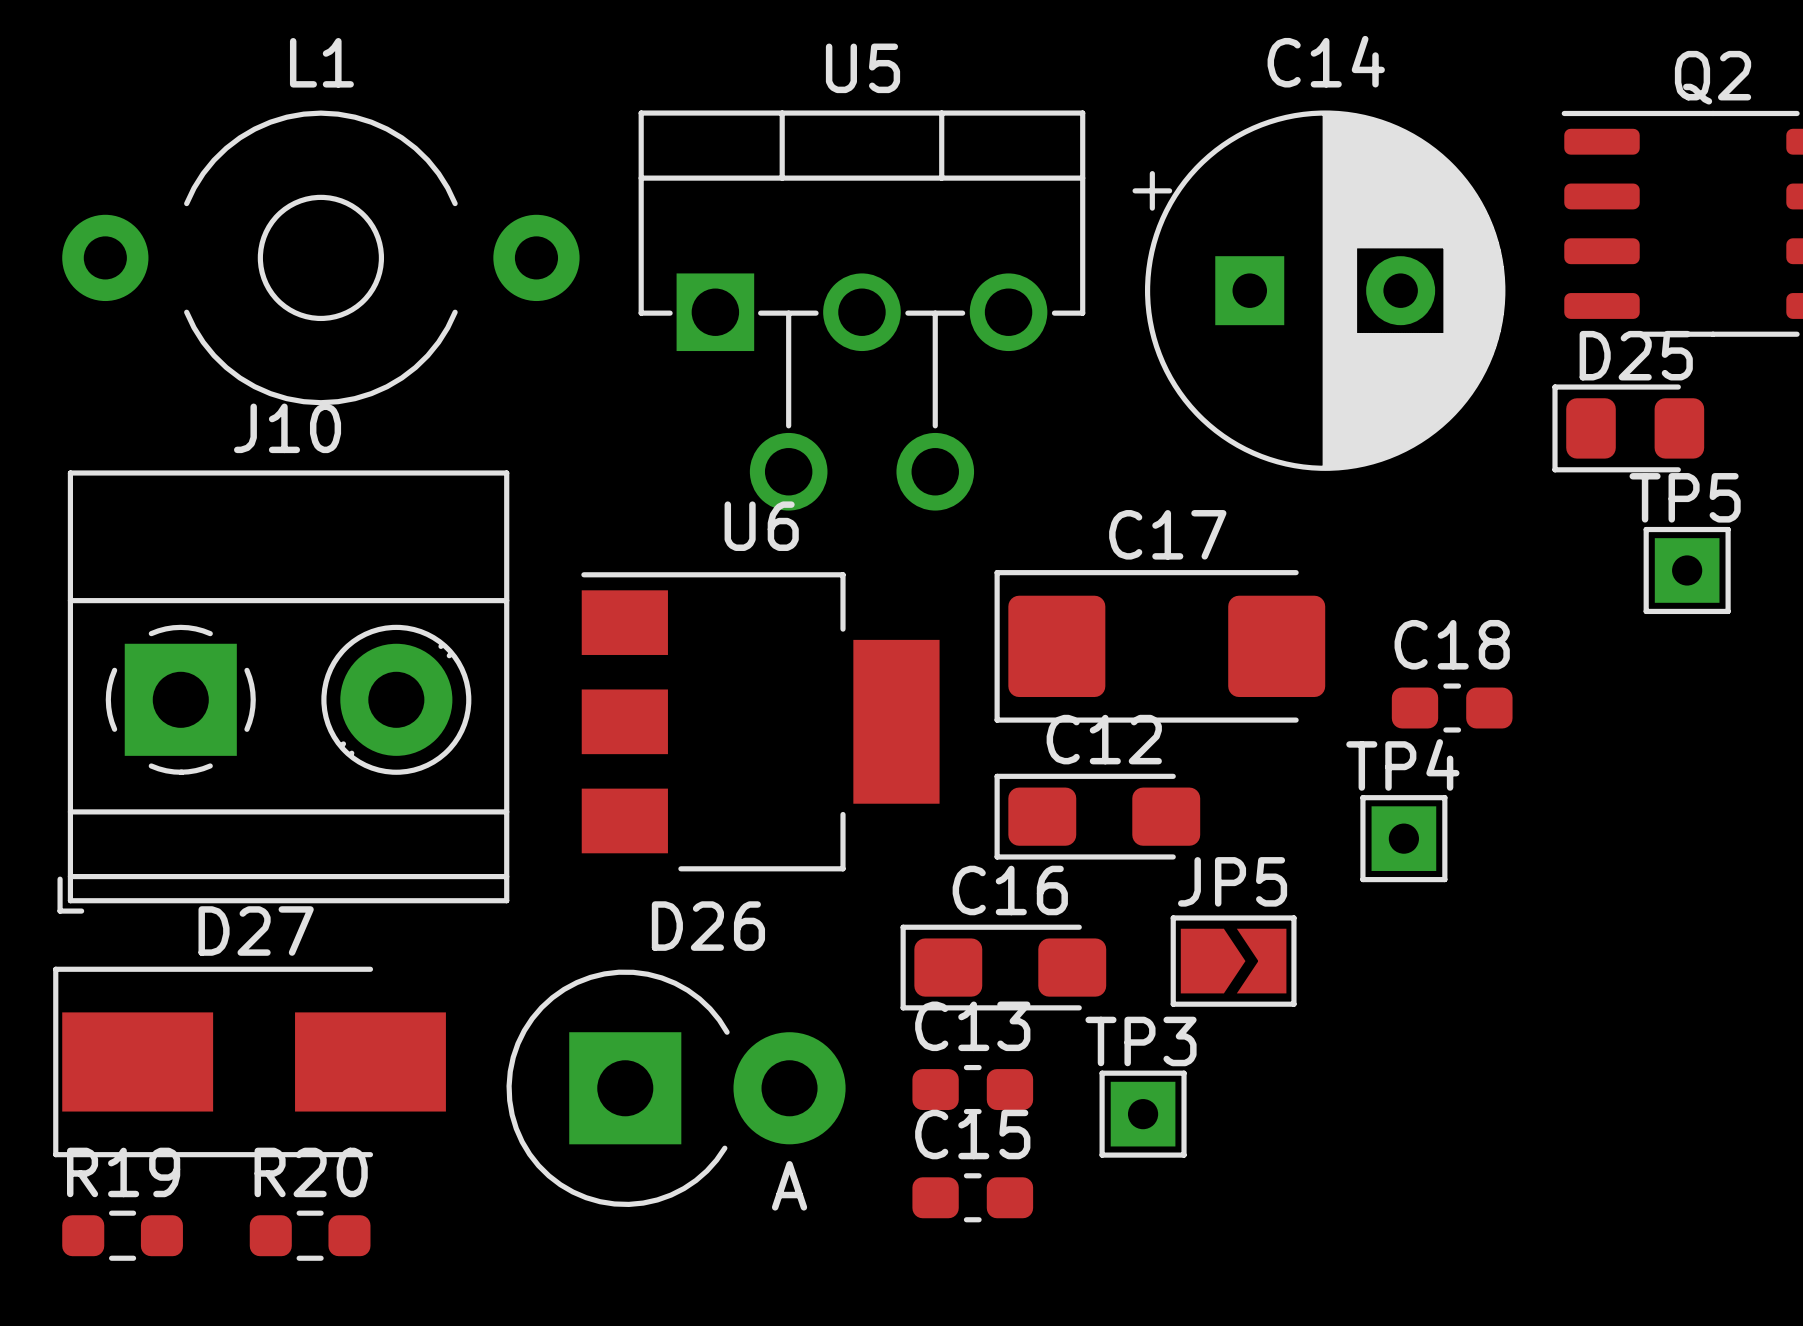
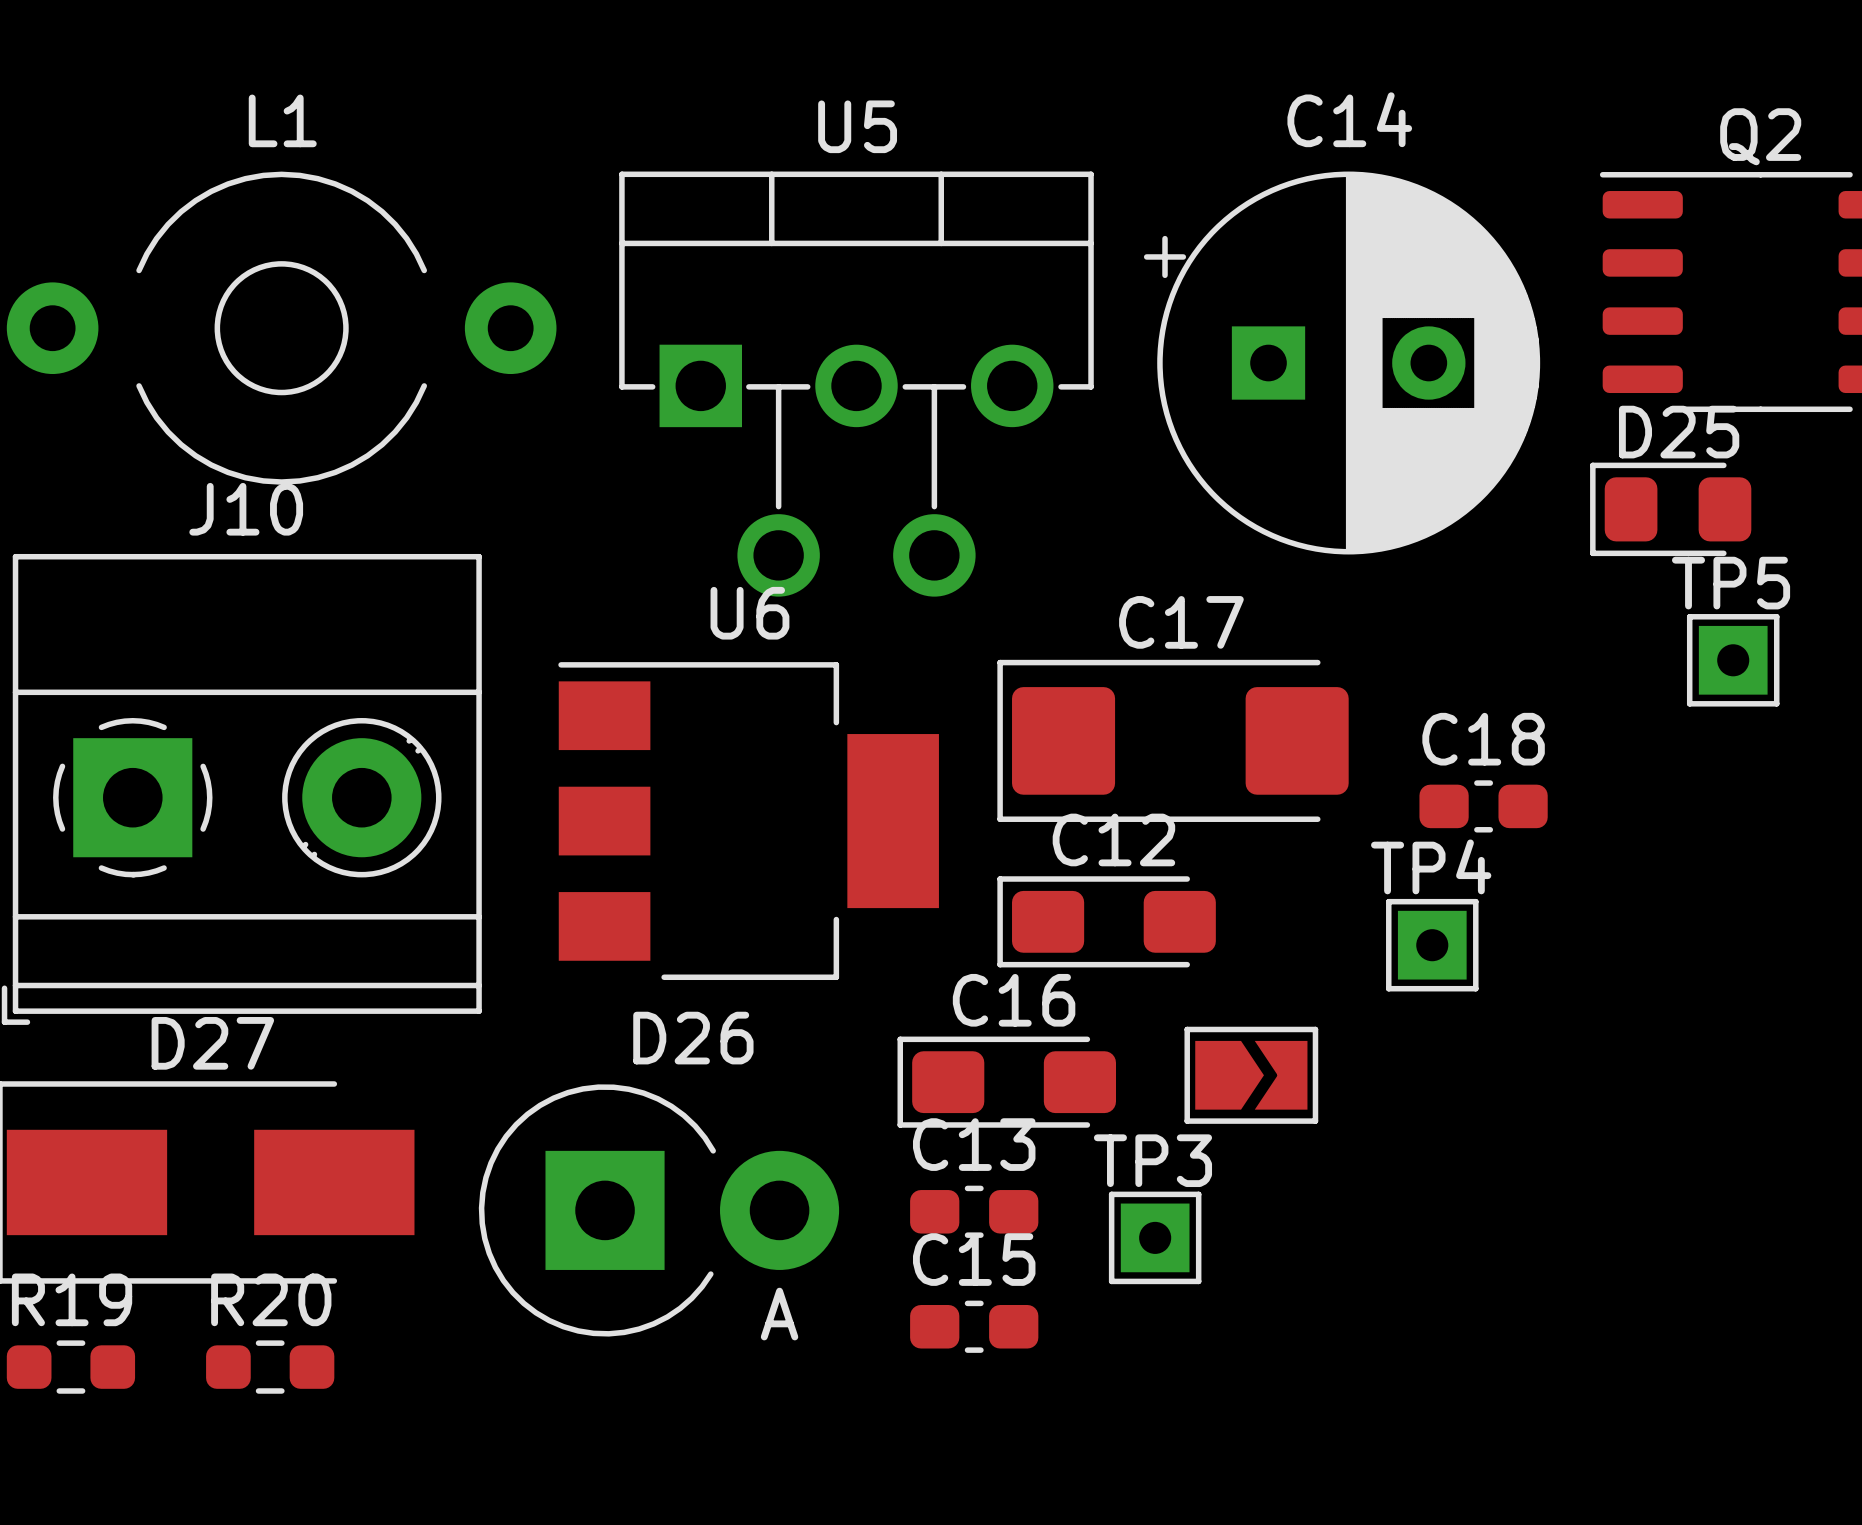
JP5 name: JP5 (1232, 881) -> none

